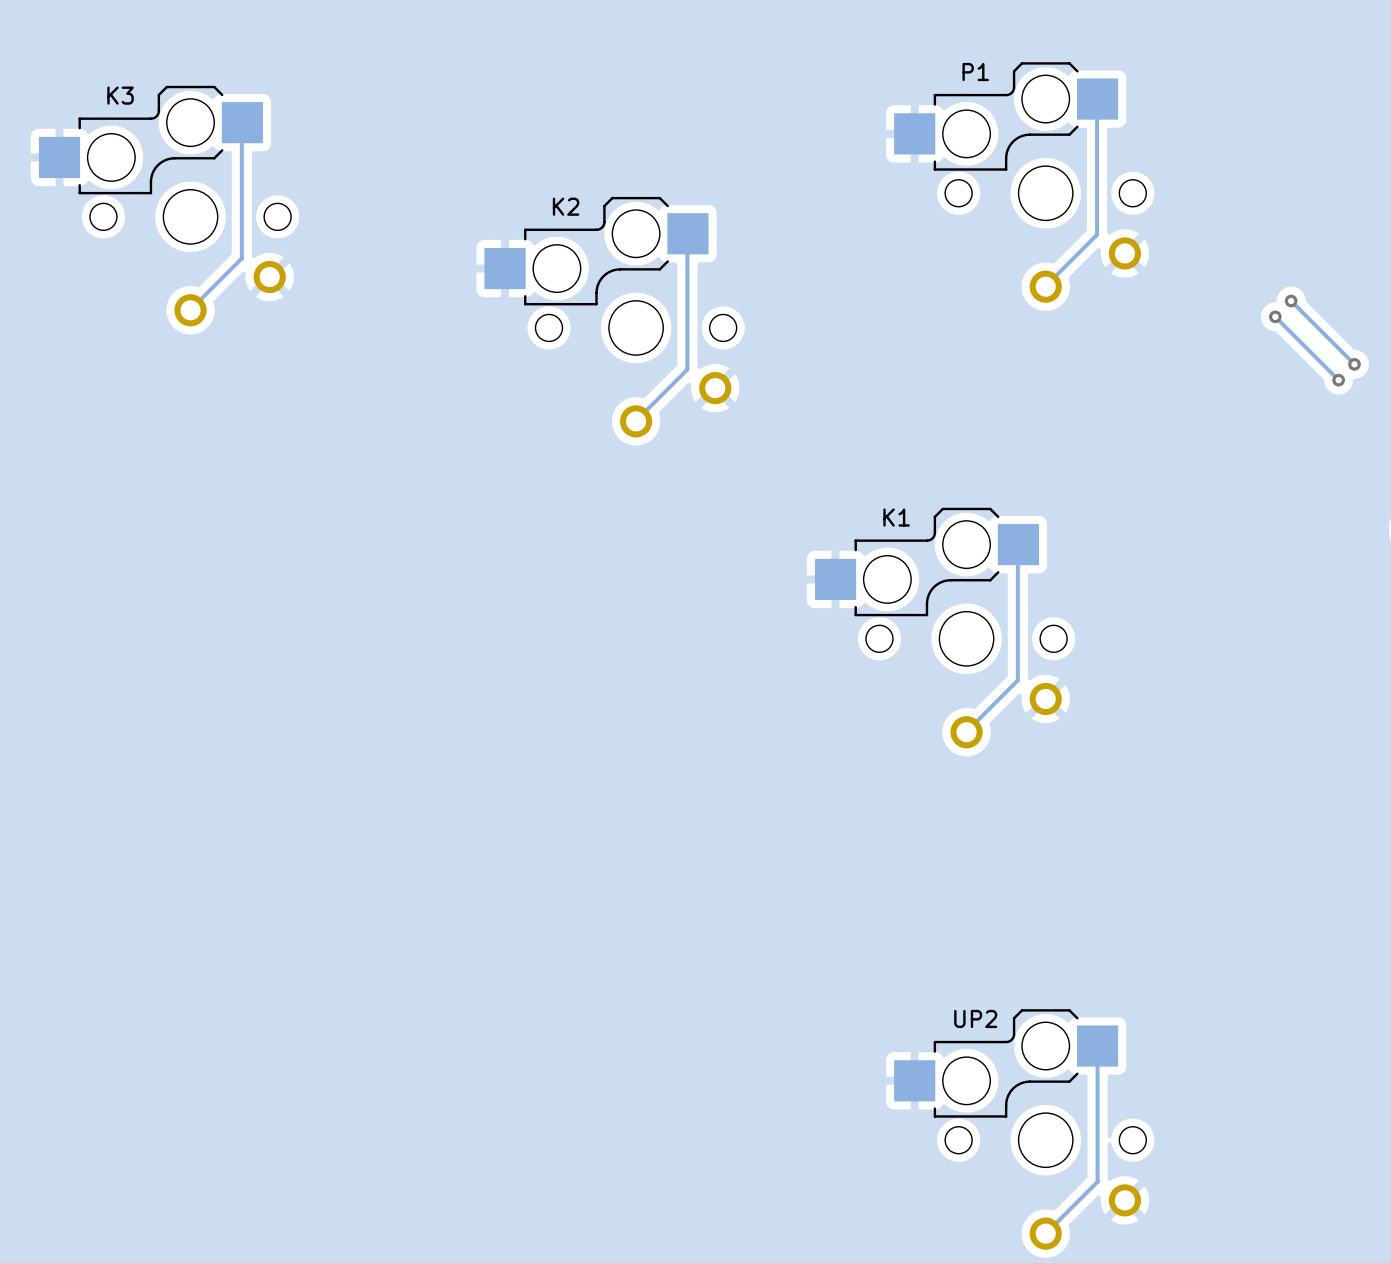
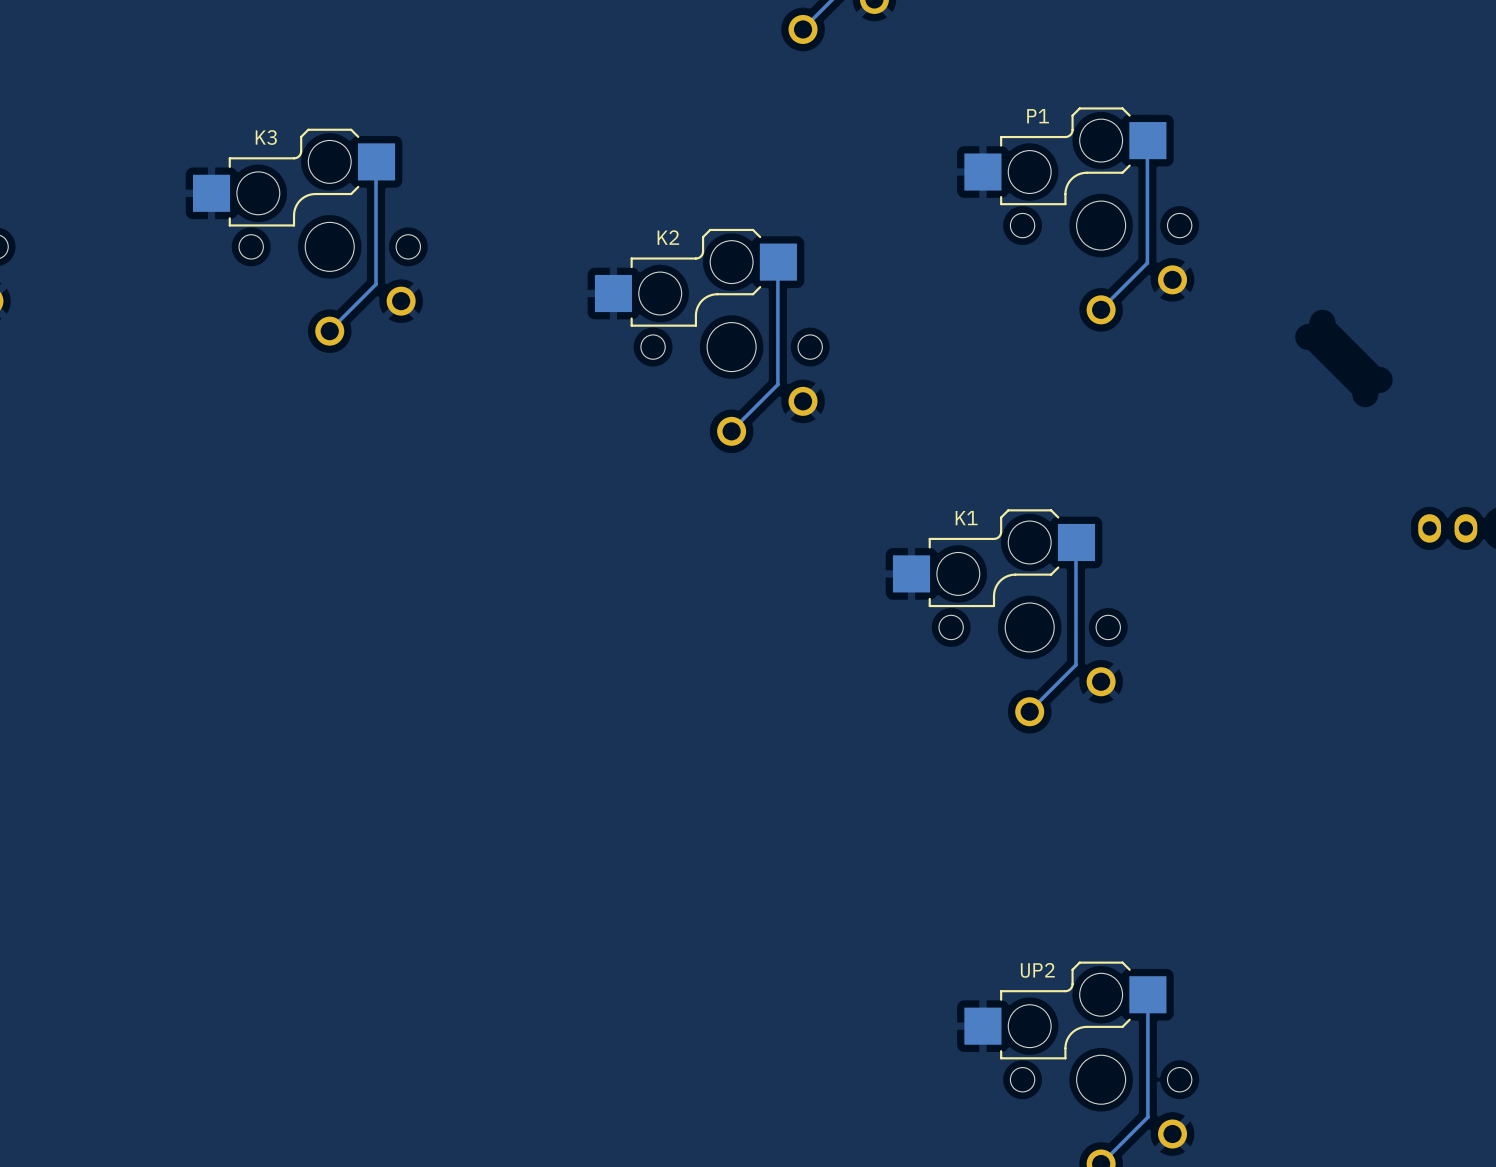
track: (1291, 301) (1354, 364) -> none
via: (1291, 301) -> none
track: (1275, 316) (1338, 380) -> none
via: (1275, 316) -> none
via: (1354, 364) -> none
via: (1338, 380) -> none

